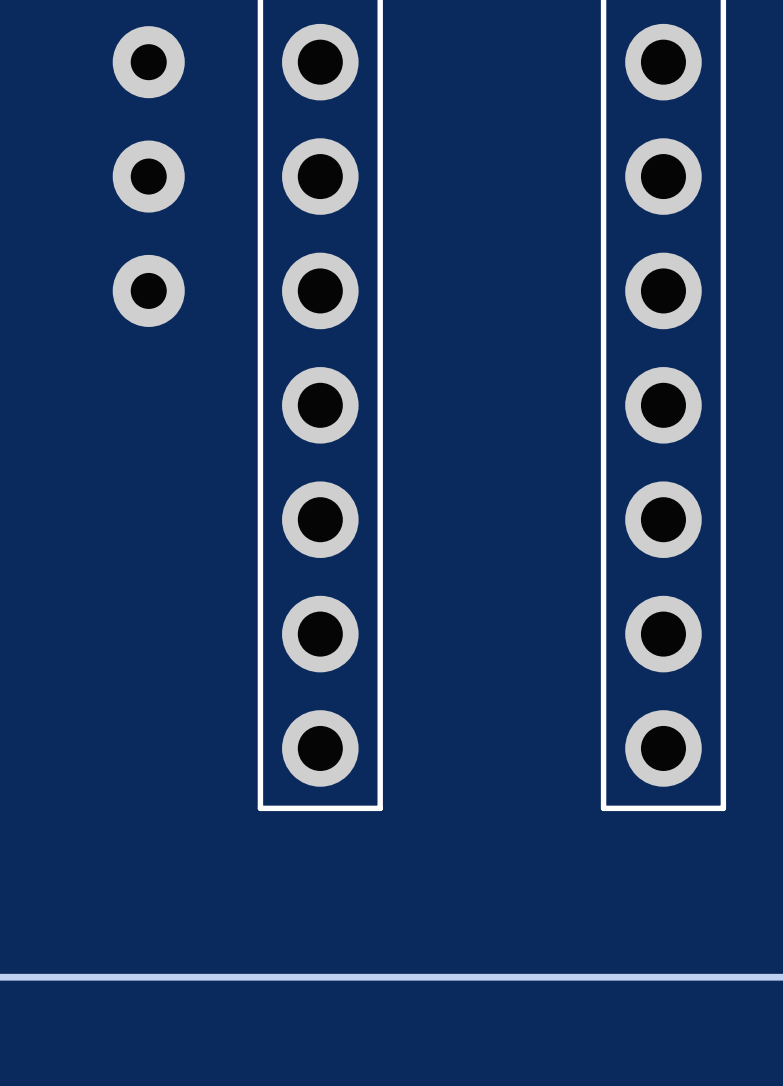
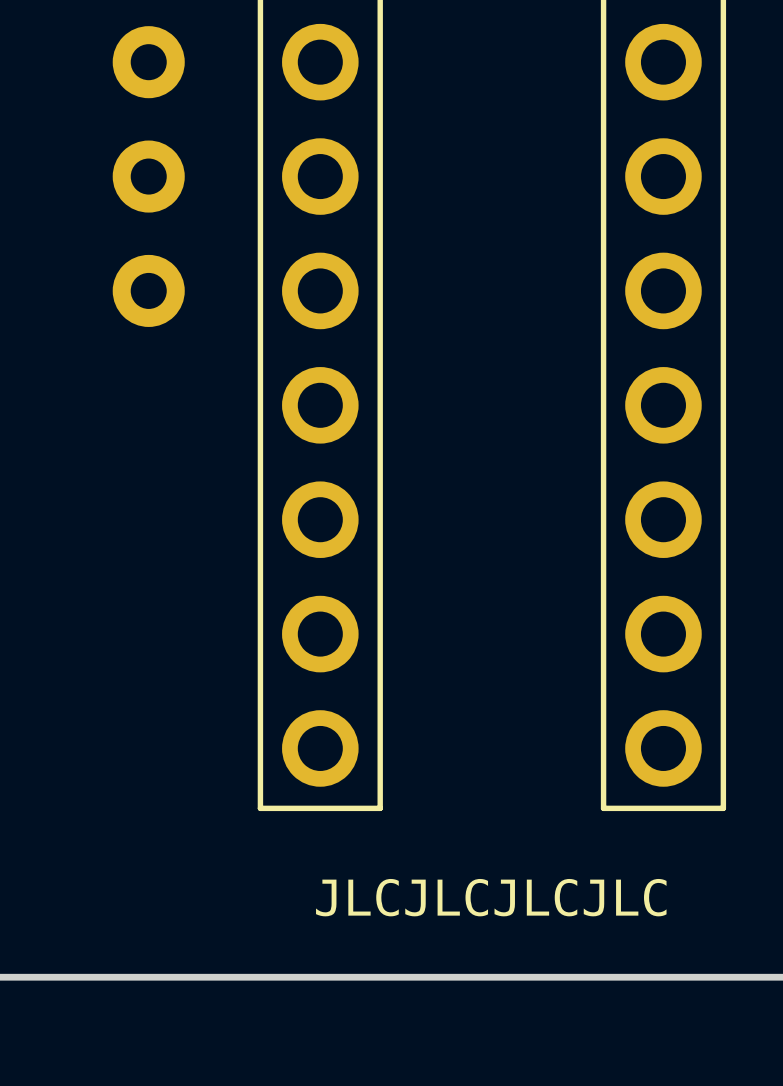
text: none -> JLCJLCJLCJLC (491, 897)

